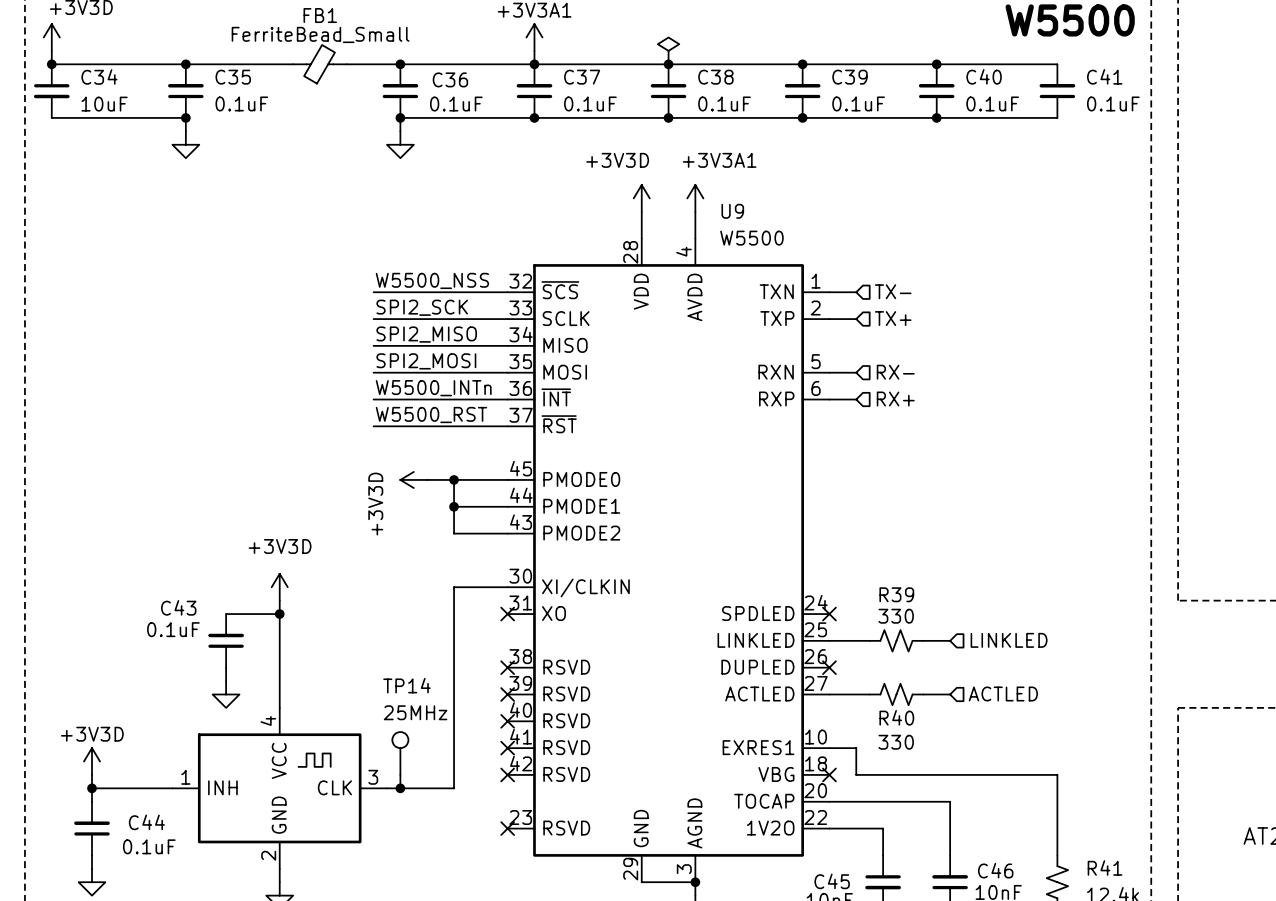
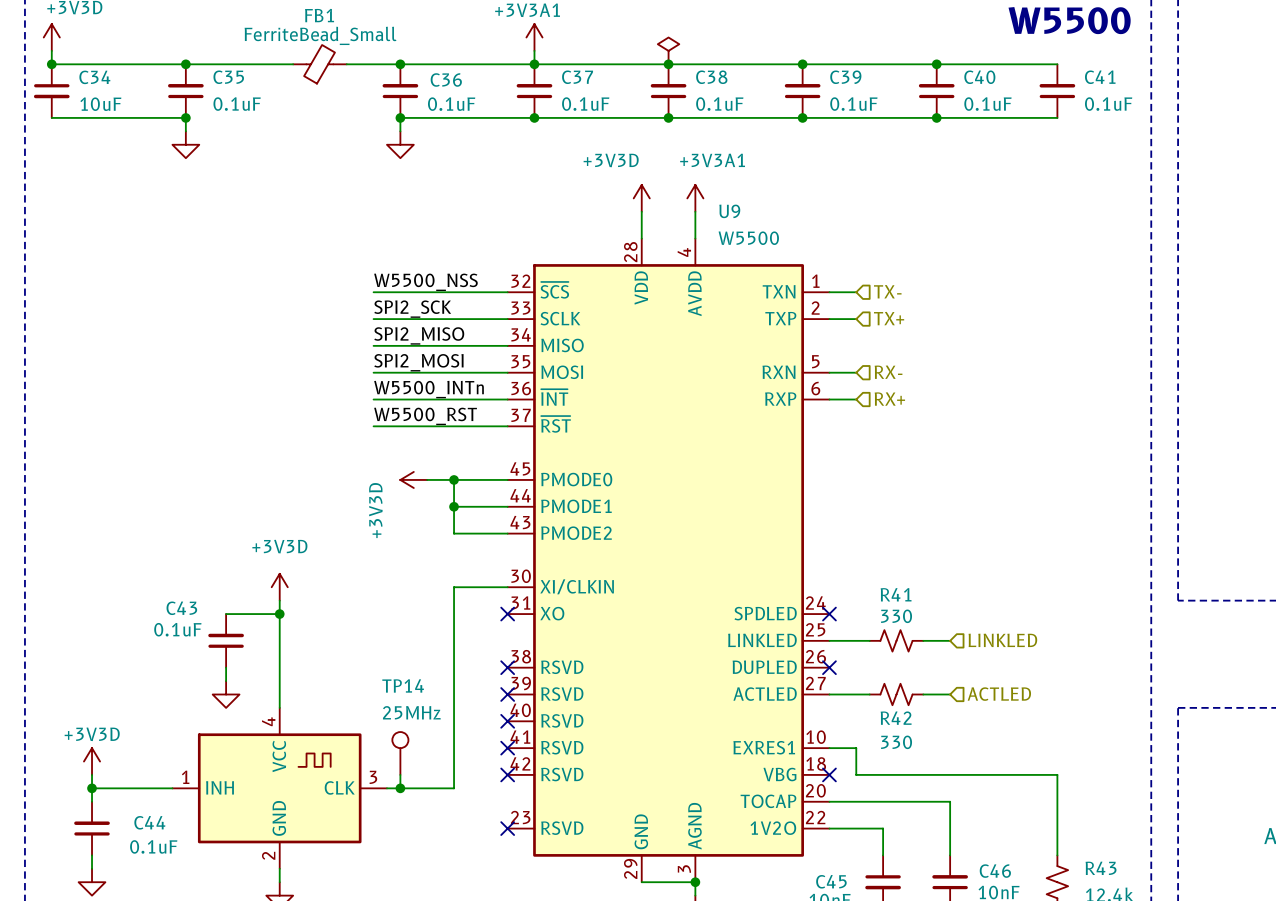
R39 name: R39 (896, 594) -> R41 (896, 594)
R40 name: R40 (896, 717) -> R42 (896, 718)
R41 name: R41 (1105, 867) -> R43 (1101, 868)

